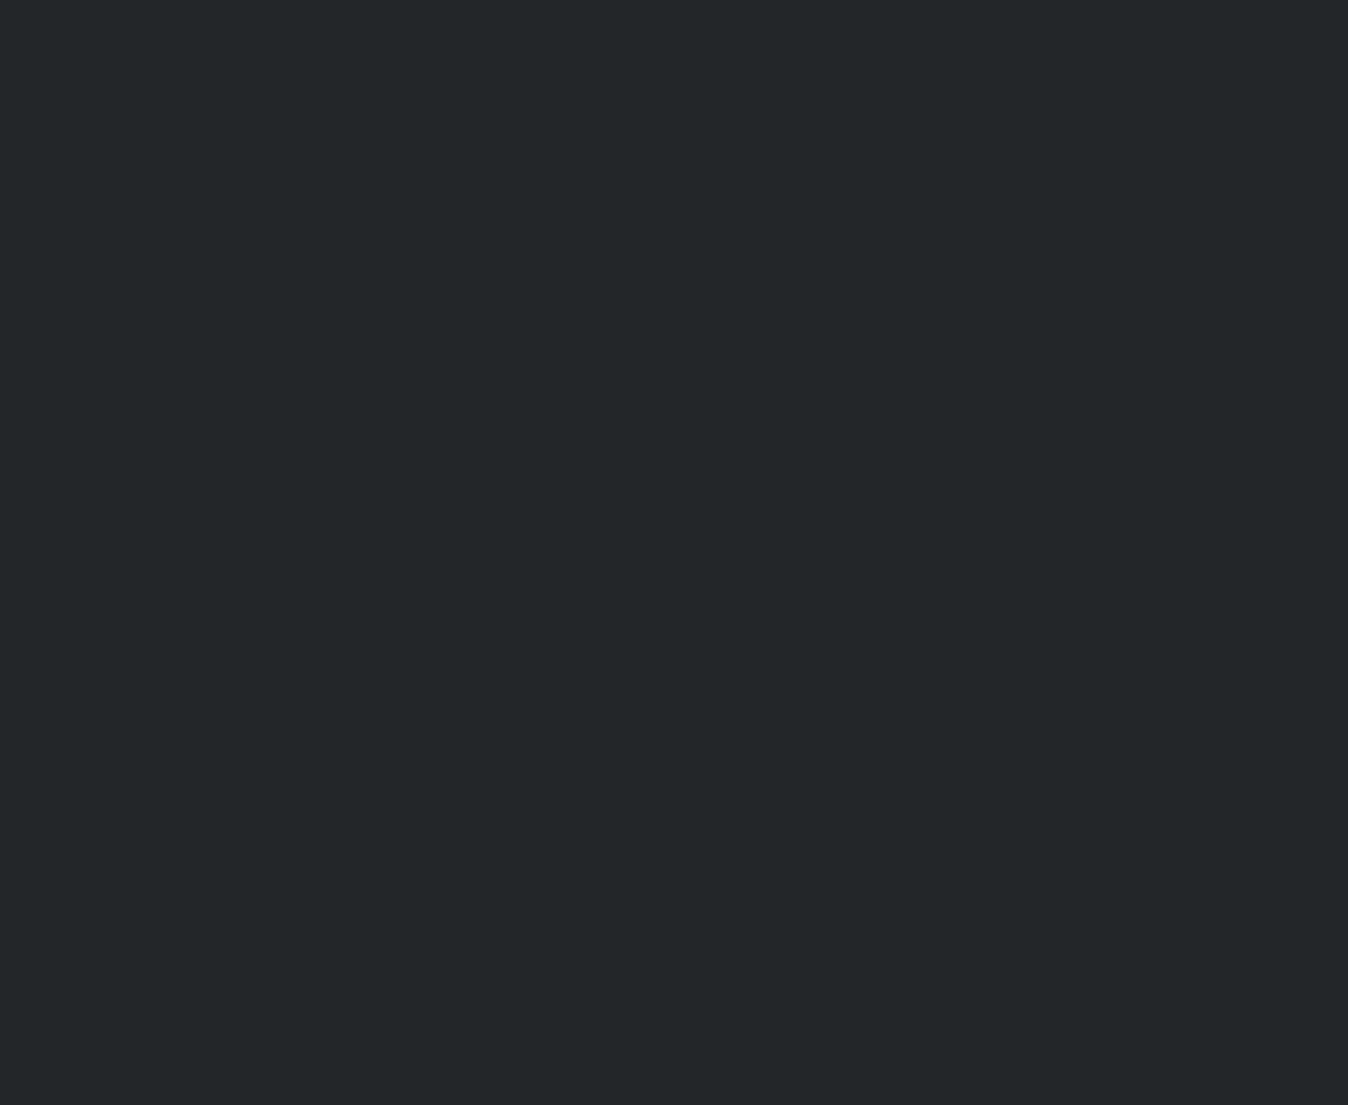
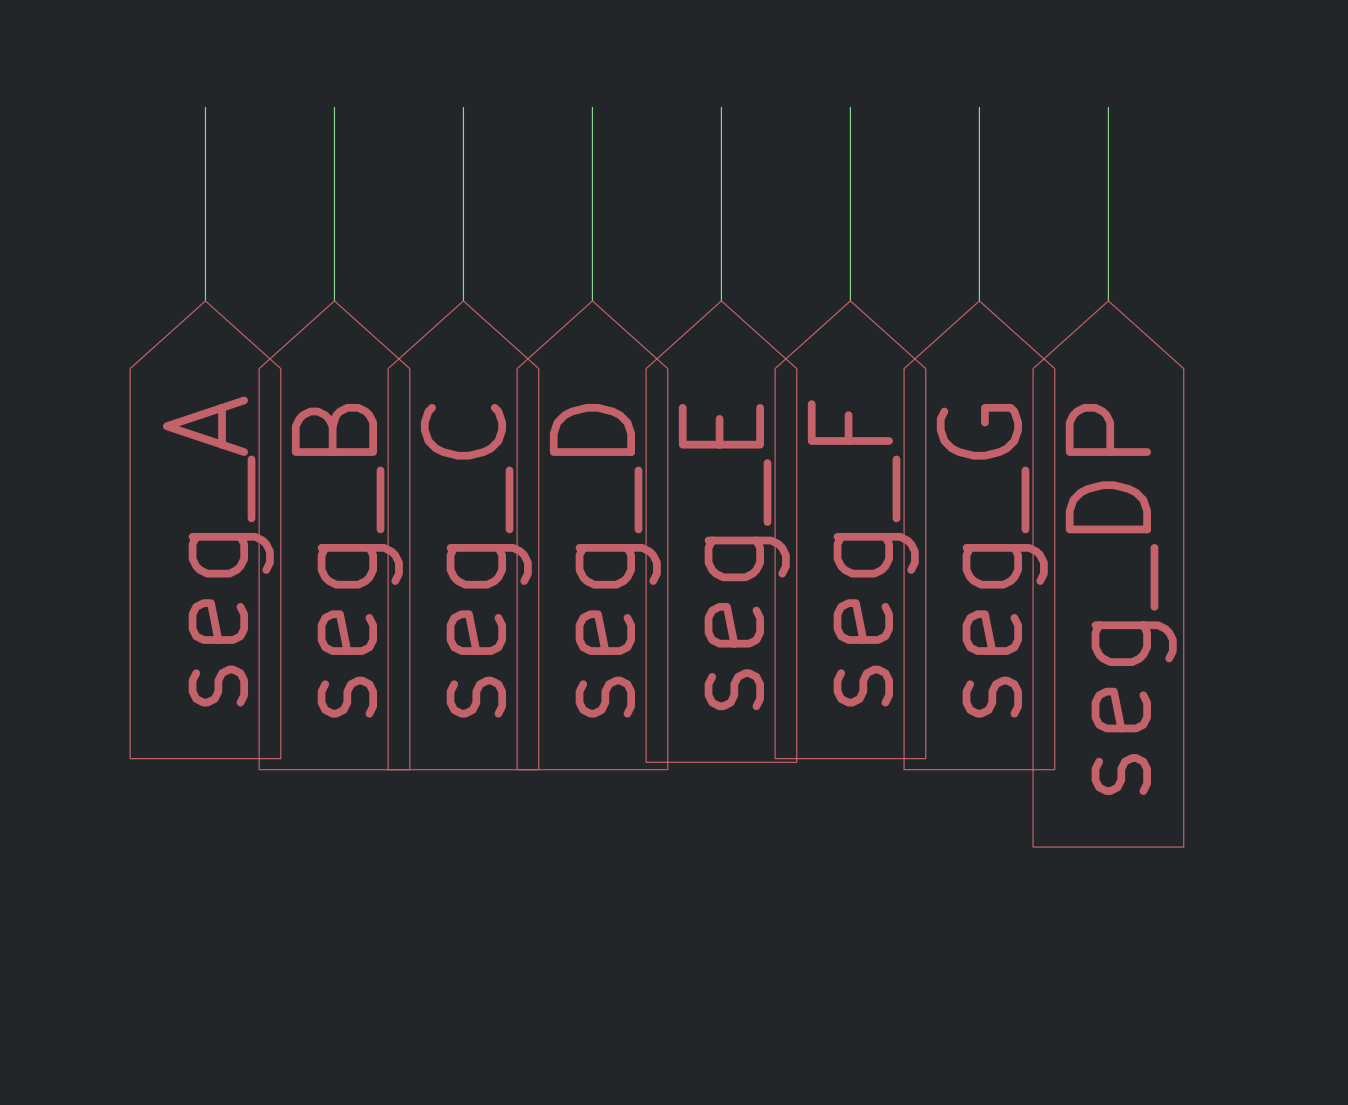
wire: none -> (205, 107) (205, 300)
wire: none -> (334, 107) (334, 300)
wire: none -> (463, 107) (463, 300)
wire: none -> (592, 107) (592, 300)
wire: none -> (721, 107) (721, 300)
wire: none -> (850, 107) (850, 300)
wire: none -> (979, 107) (979, 300)
wire: none -> (1108, 107) (1108, 300)
global label: none -> seg_A (218, 551)
global label: none -> seg_F (863, 553)
global label: none -> seg_E (734, 557)
global label: none -> seg_B (347, 560)
global label: none -> seg_C (476, 560)
global label: none -> seg_D (605, 560)
global label: none -> seg_G (992, 560)
global label: none -> seg_DP (1121, 599)

